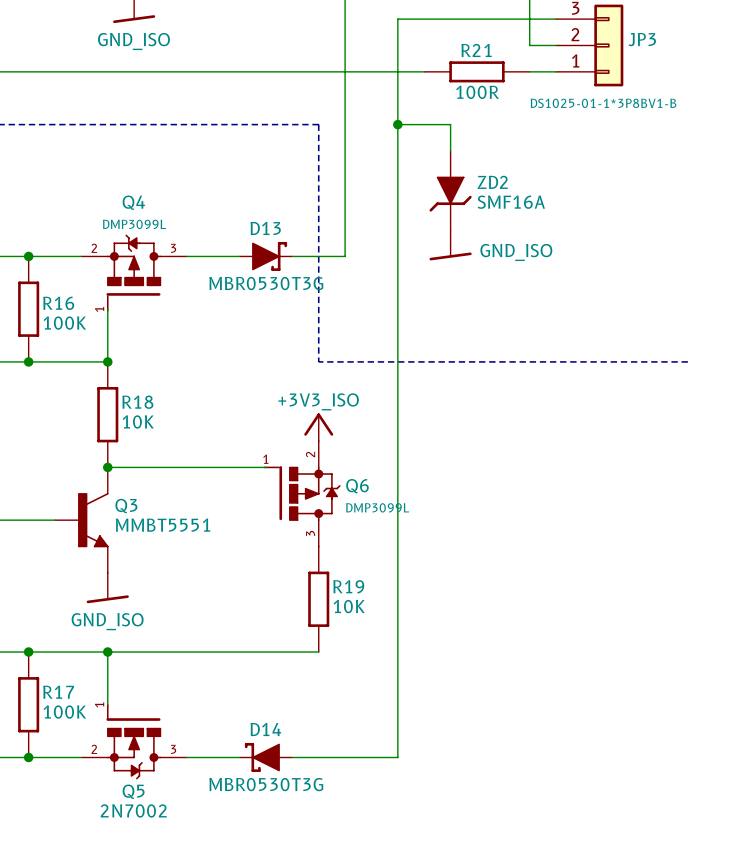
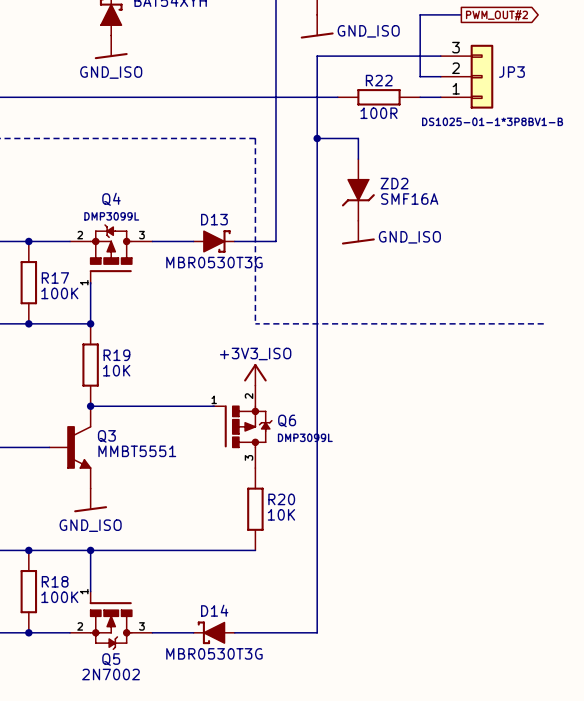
R21 name: R21 (476, 50) -> R22 (379, 80)
R16 name: R16 (58, 303) -> R17 (55, 278)
R18 name: R18 (137, 402) -> R19 (116, 355)
R19 name: R19 (348, 586) -> R20 (281, 499)
R17 name: R17 (58, 692) -> R18 (55, 581)

